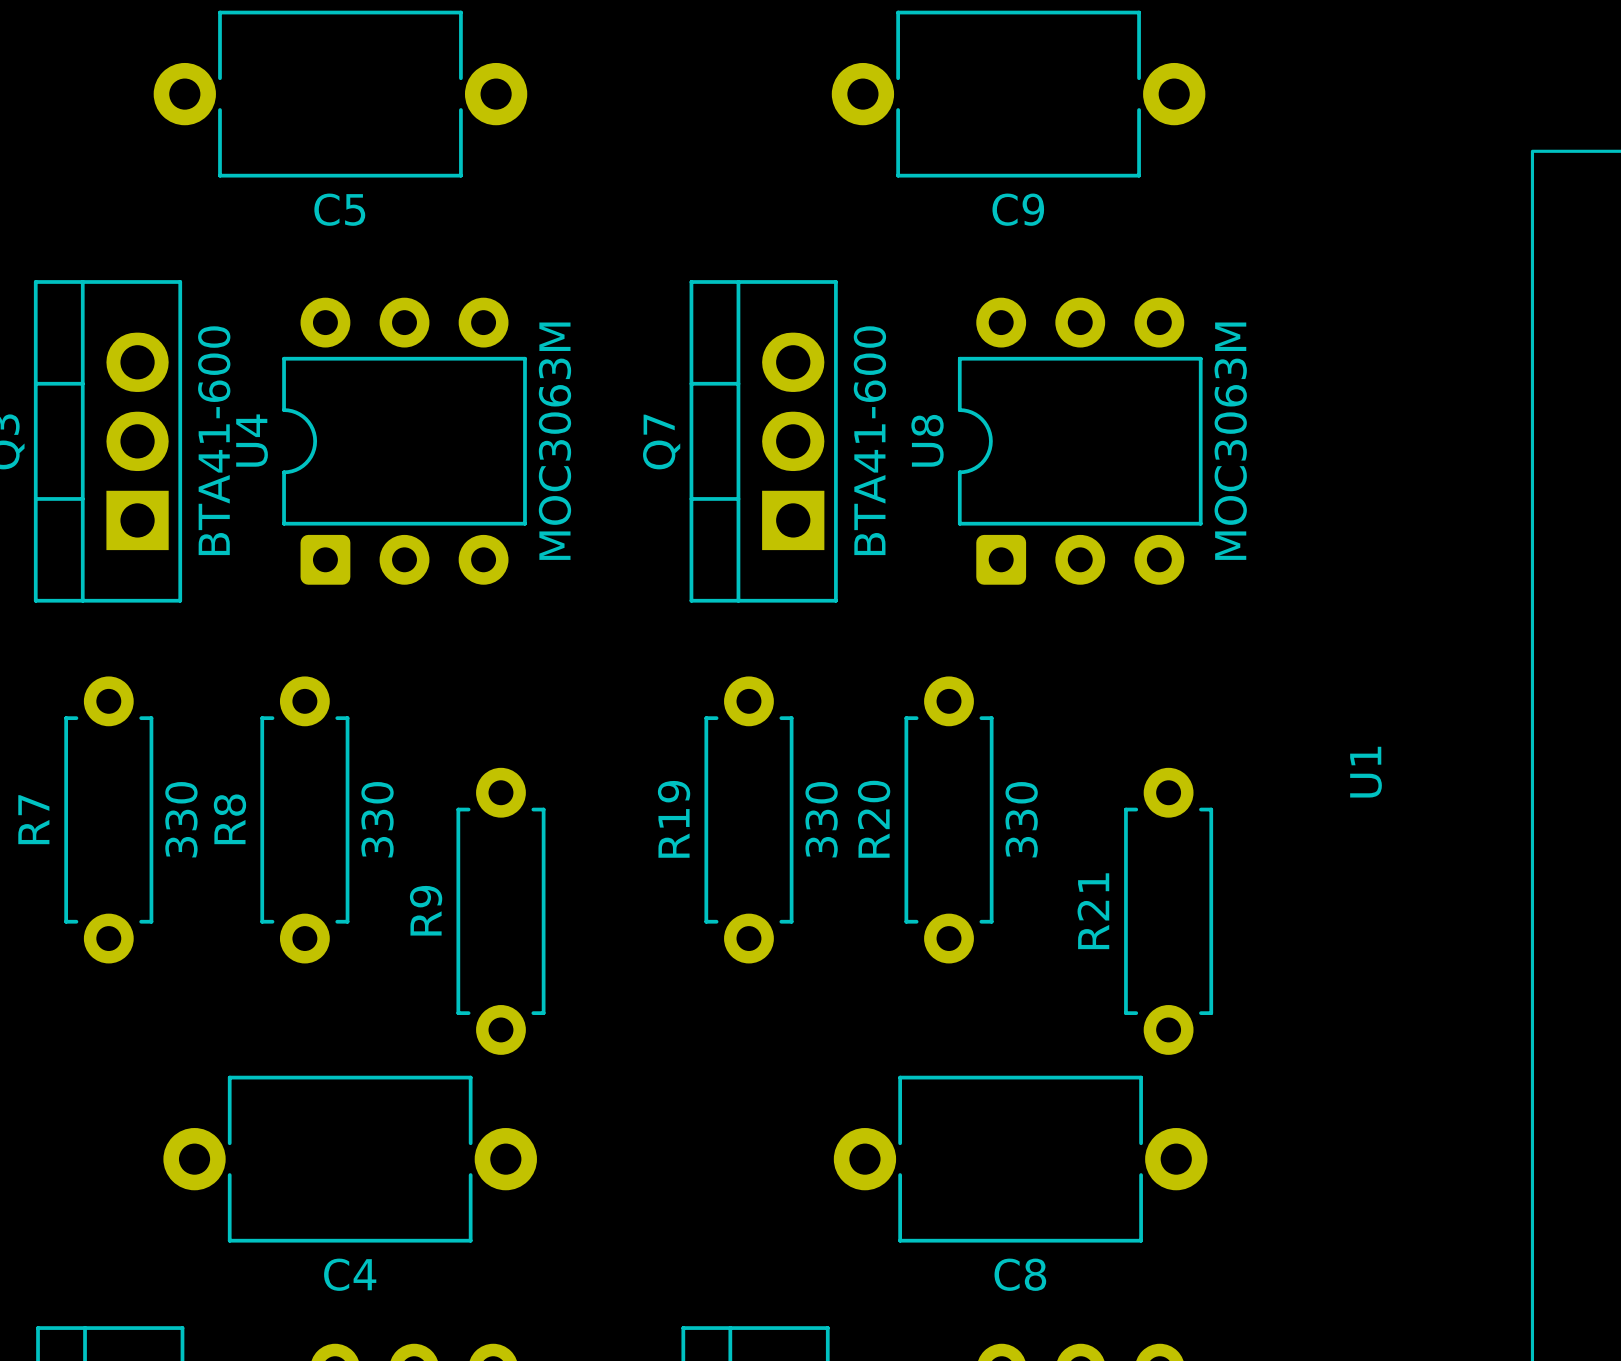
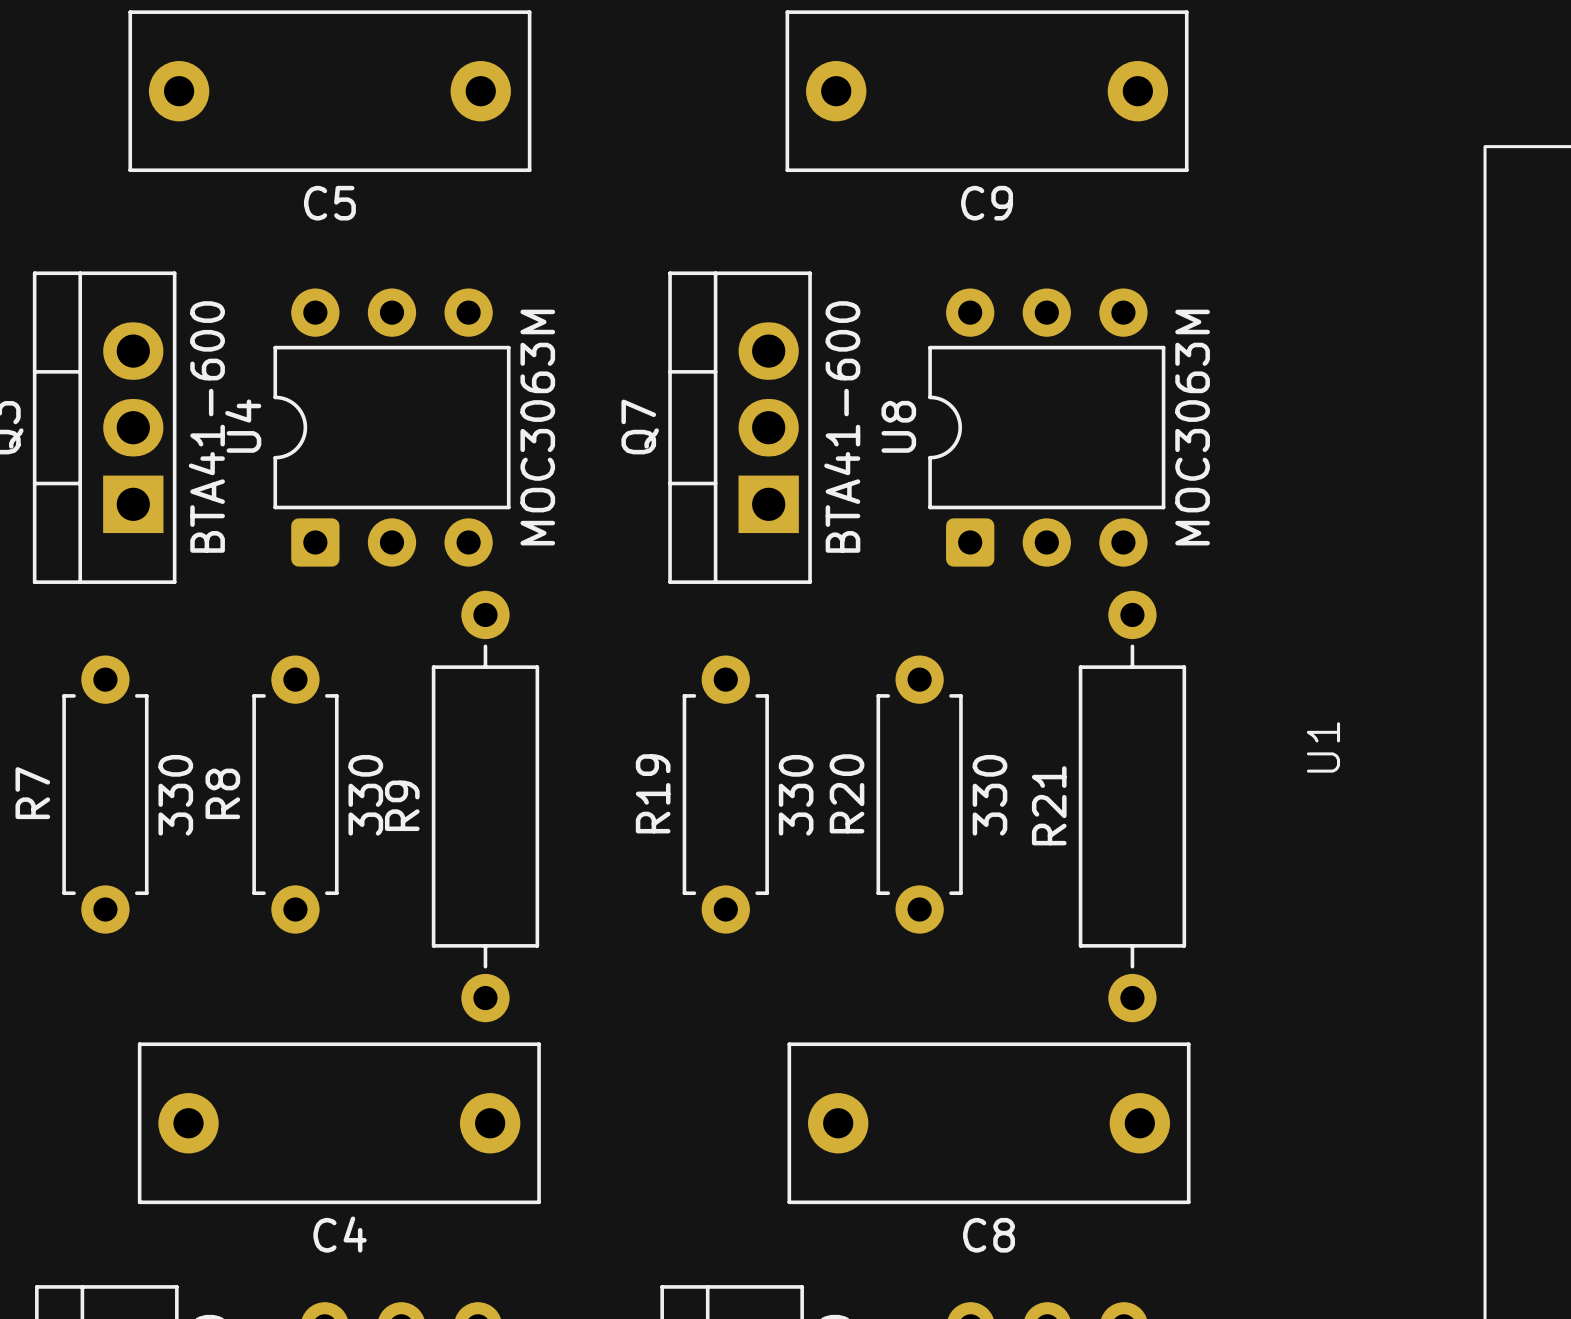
C5 footprint: [153, 10, 528, 178] -> [128, 10, 532, 173]
C9 footprint: [831, 10, 1206, 178] -> [785, 10, 1189, 173]
R9 footprint: [456, 767, 546, 1055] -> [431, 590, 540, 1023]
R21 footprint: [1124, 767, 1214, 1055] -> [1078, 590, 1187, 1023]
C4 footprint: [163, 1075, 537, 1243] -> [137, 1042, 541, 1205]
C8 footprint: [833, 1075, 1208, 1243] -> [787, 1042, 1191, 1205]

